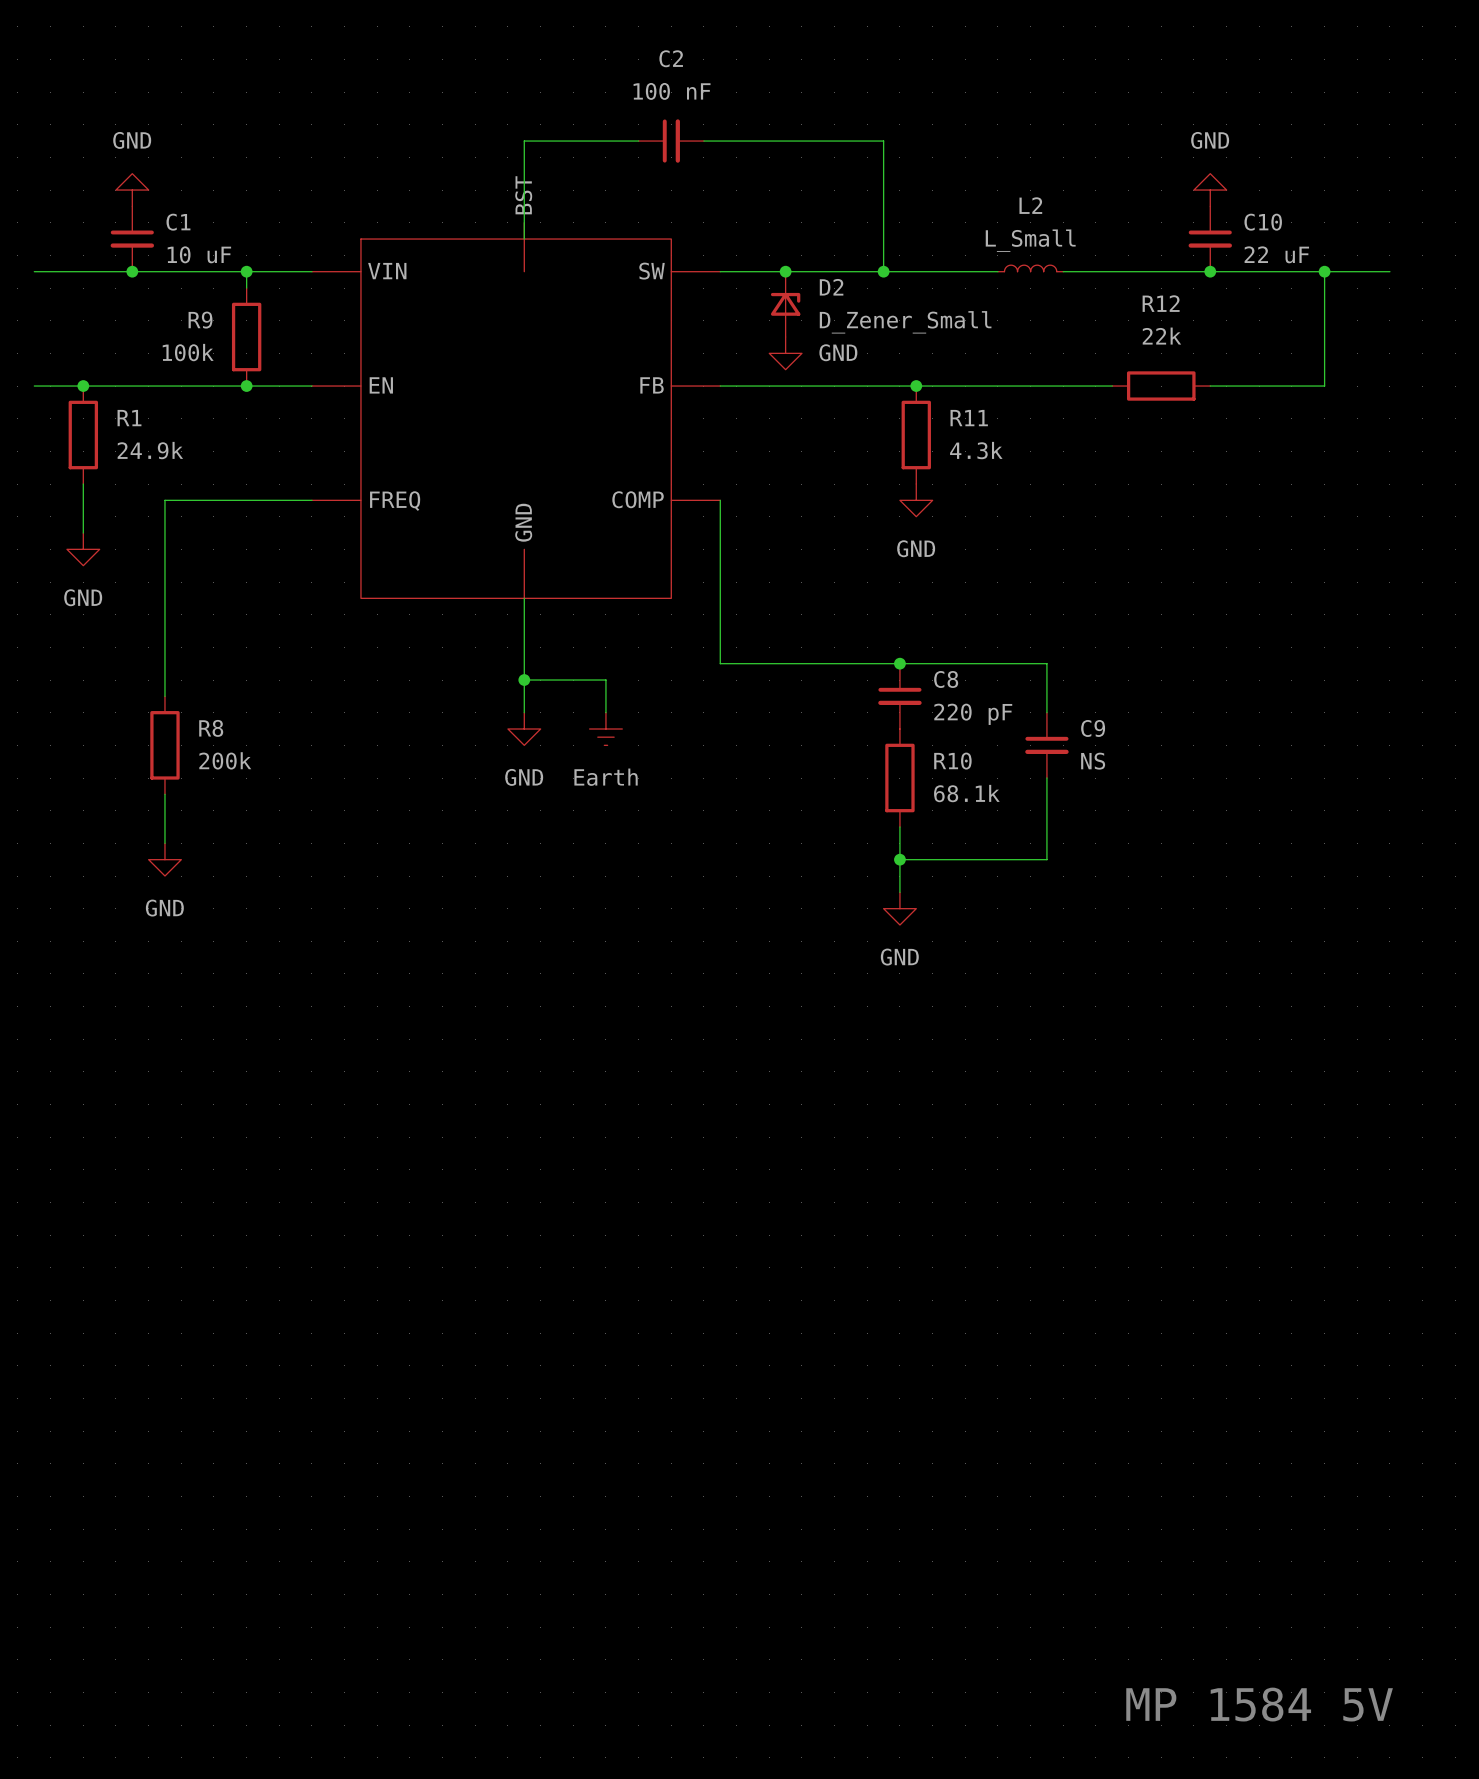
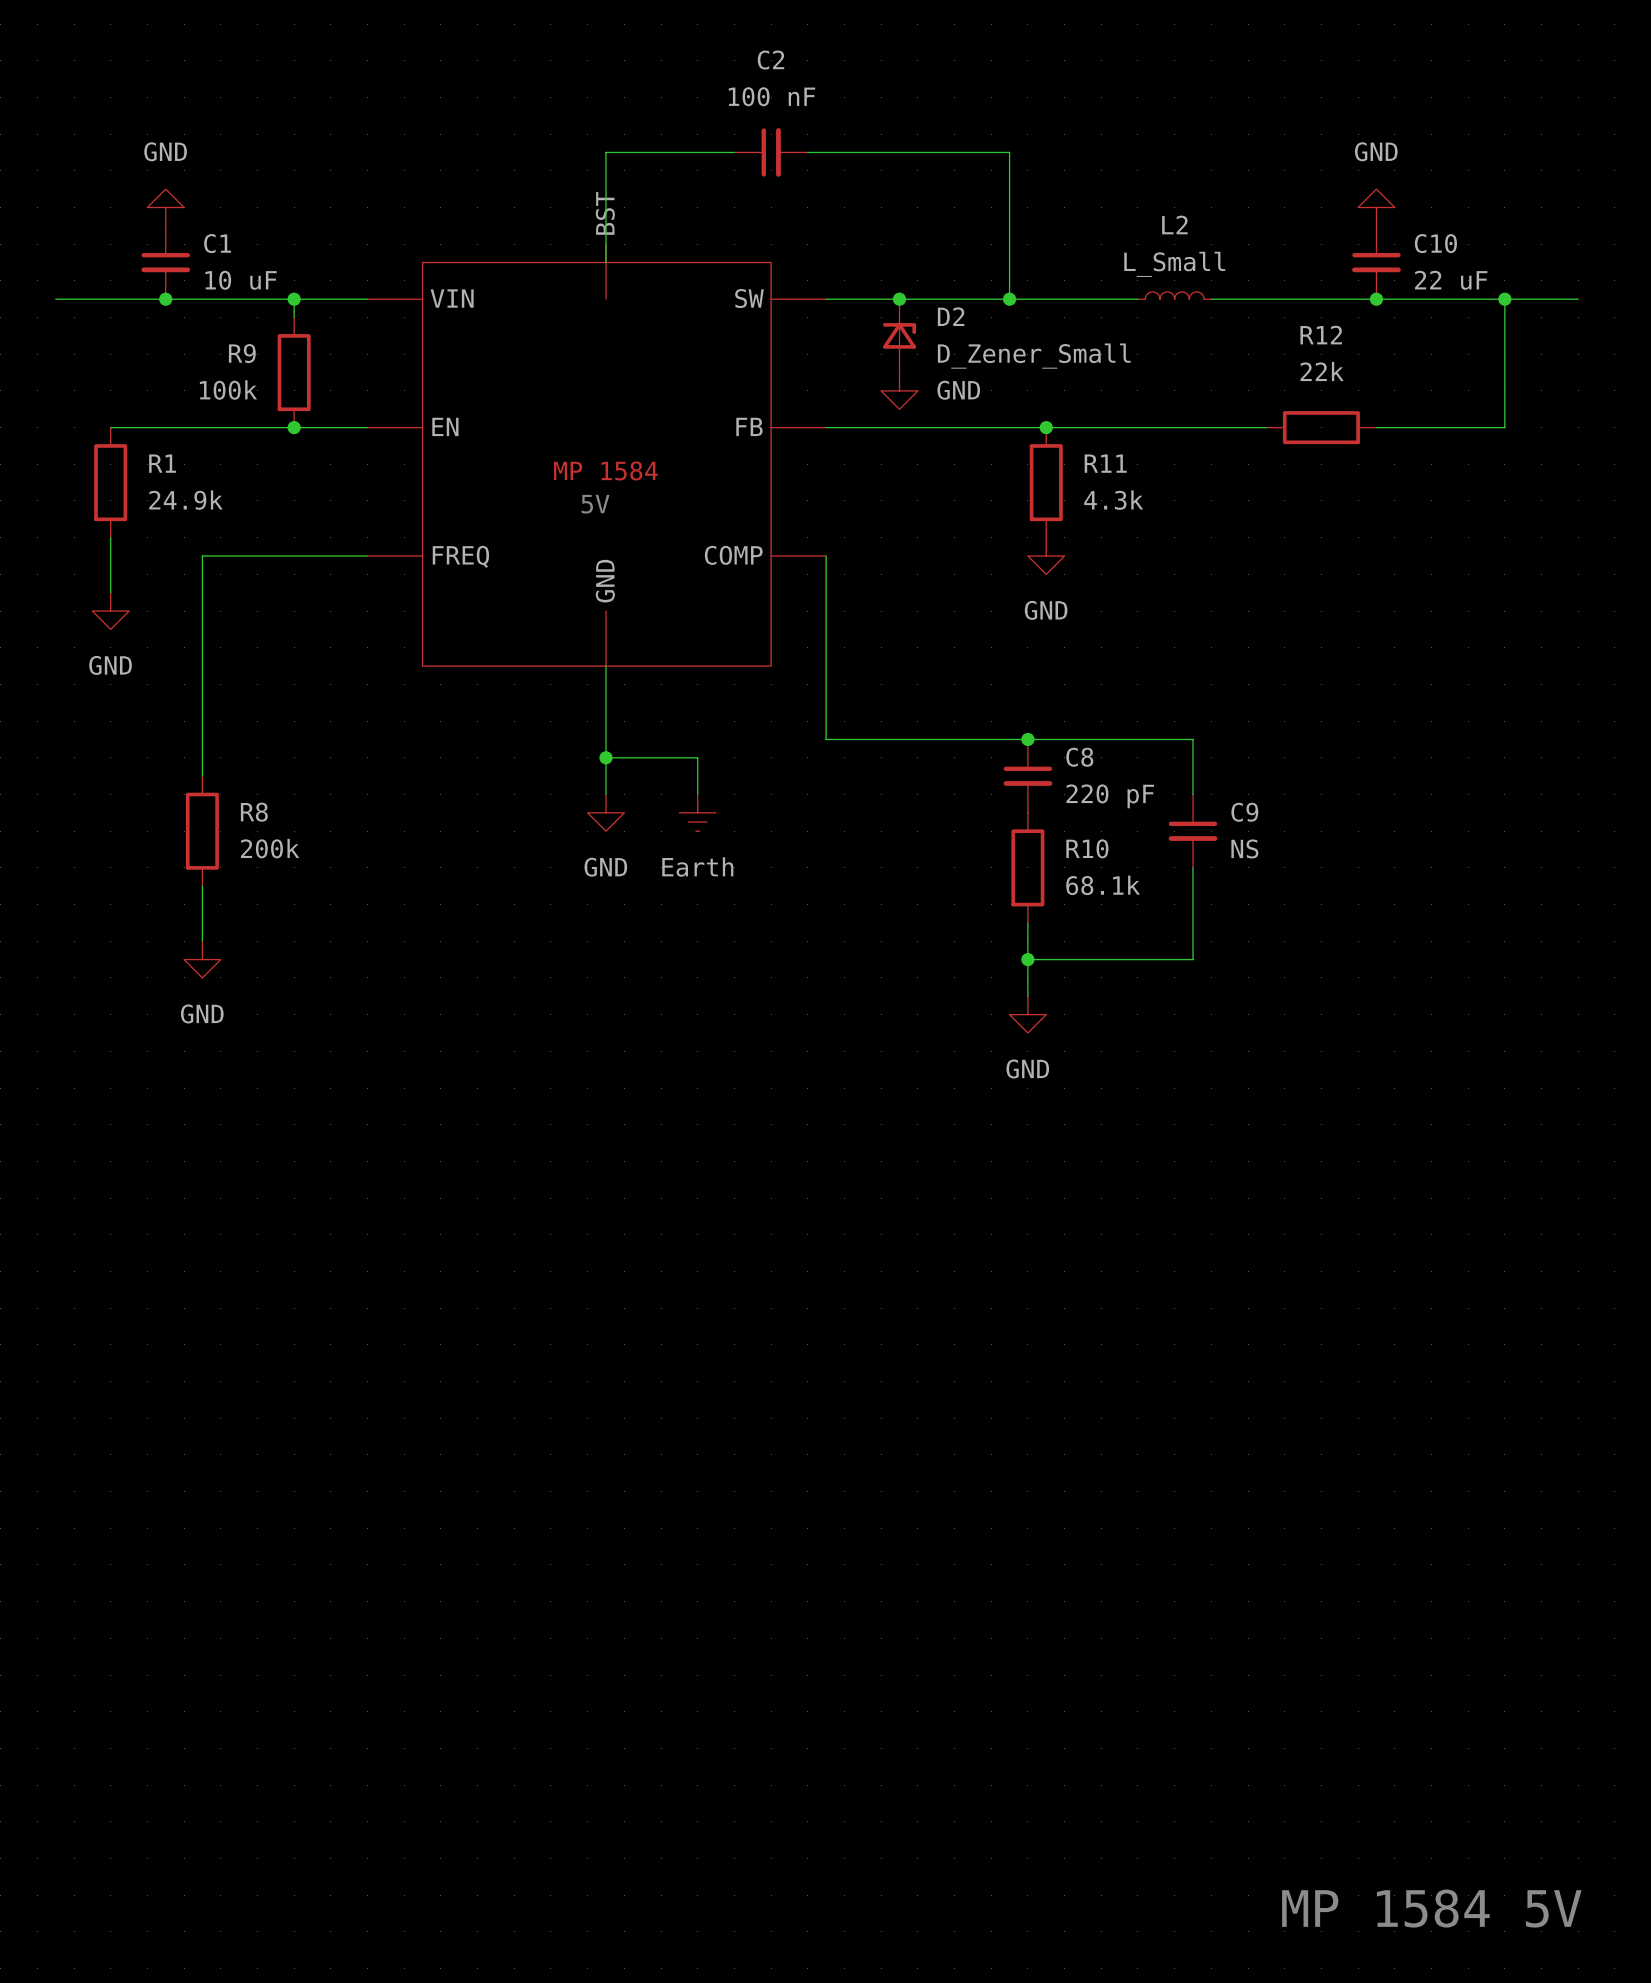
wire: (34, 386) (83, 386) -> none
junction: (83, 386) -> none
part text: none -> MP 1584 (605, 470)
text: none -> 5V (595, 504)

